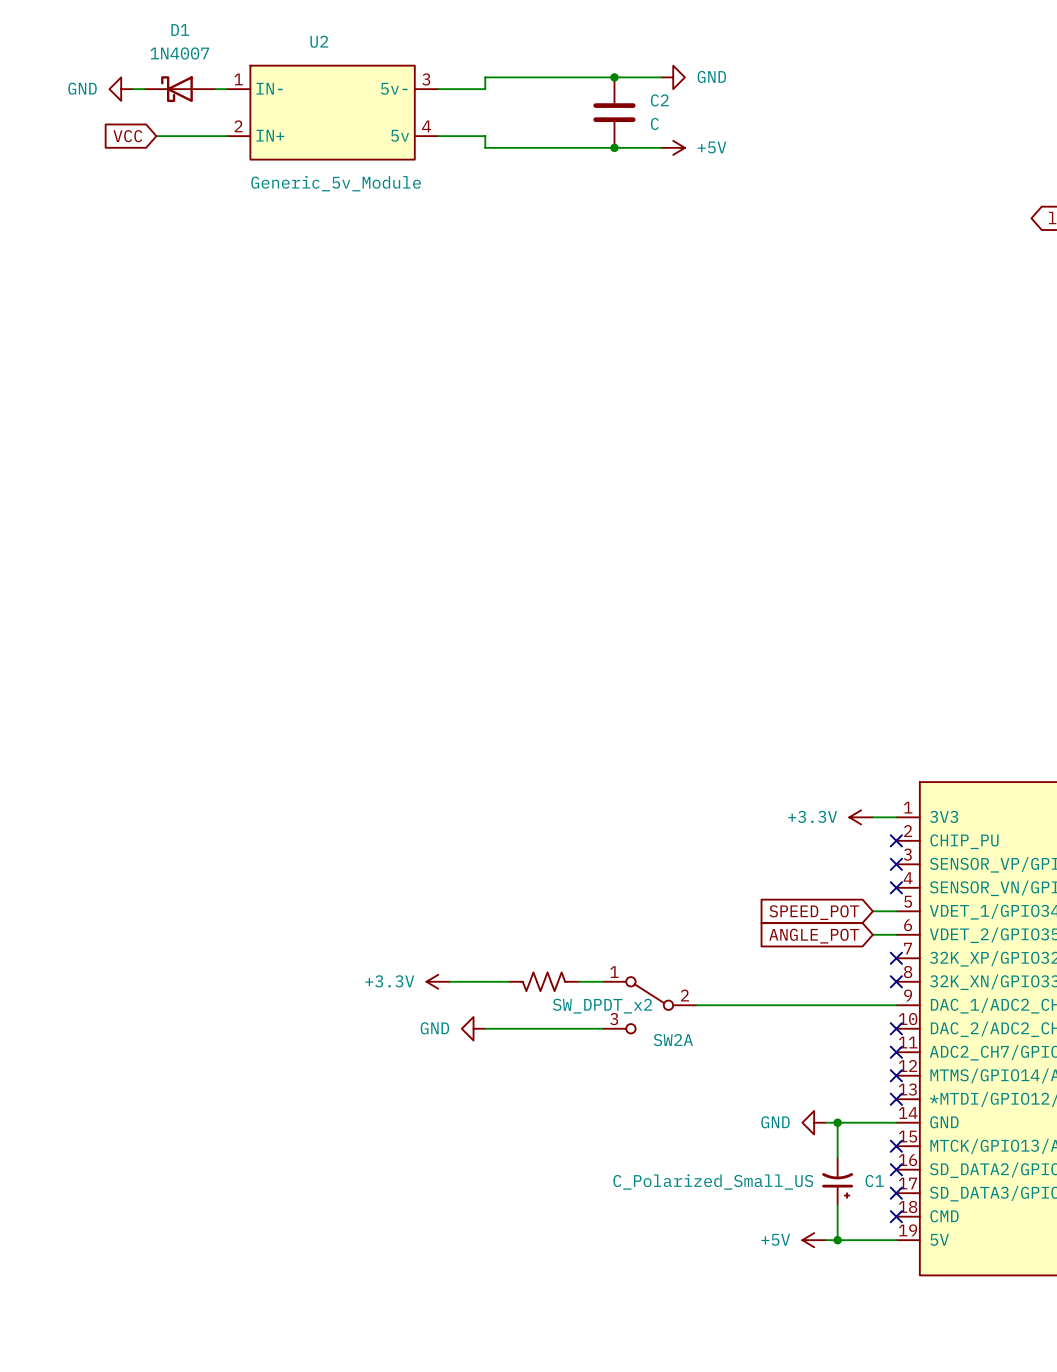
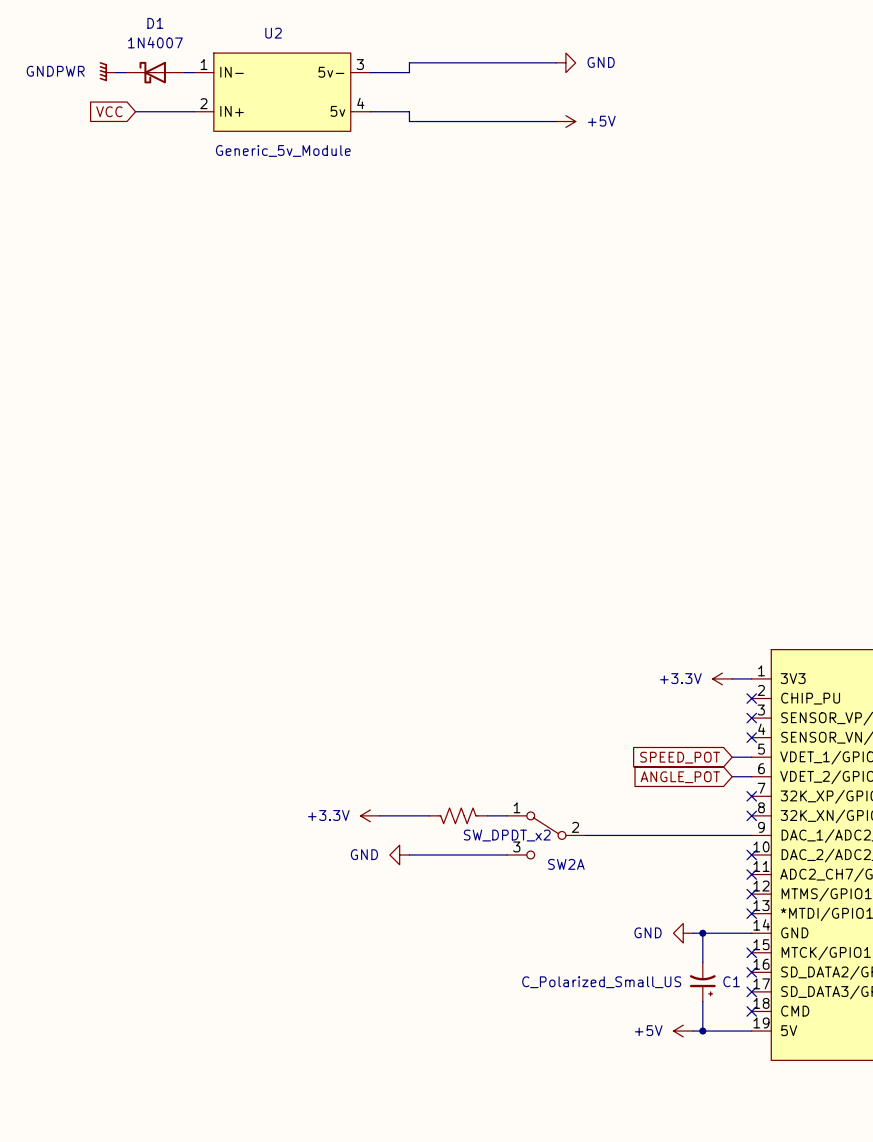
junction: (614, 77) -> none
power symbol: GND (121, 89) -> GNDPWR (107, 71)
C2: C (614, 112) -> none
junction: (614, 147) -> none

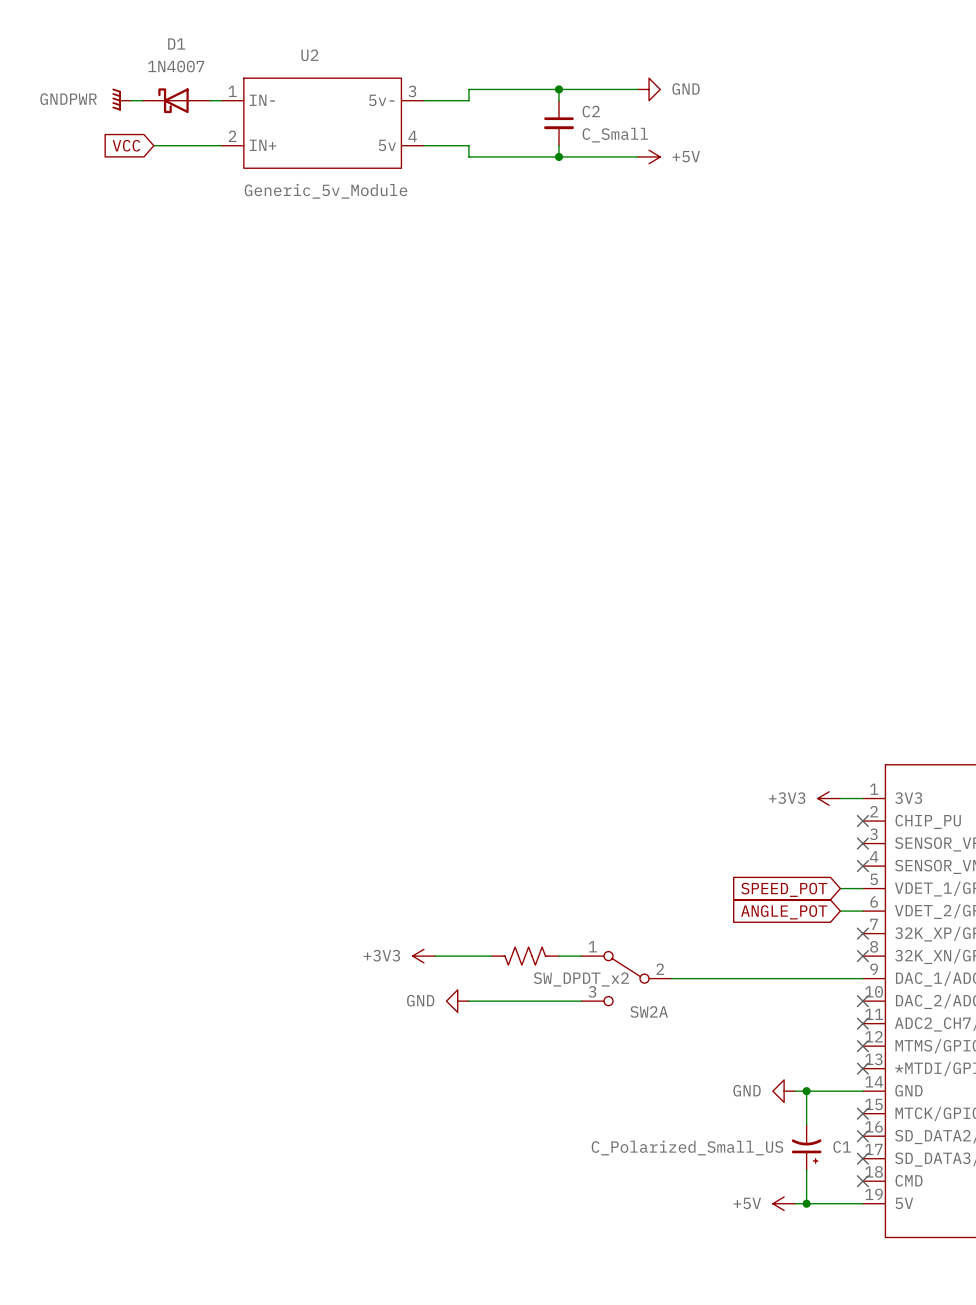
wire: none -> (559, 89) (559, 100)
junction: none -> (559, 89)
C2: none -> C_Small (559, 123)
wire: none -> (559, 145) (559, 156)
junction: none -> (559, 156)
power symbol: +3.3V (722, 678) -> +3V3 (829, 798)
power symbol: +3.3V (370, 815) -> +3V3 (423, 956)

